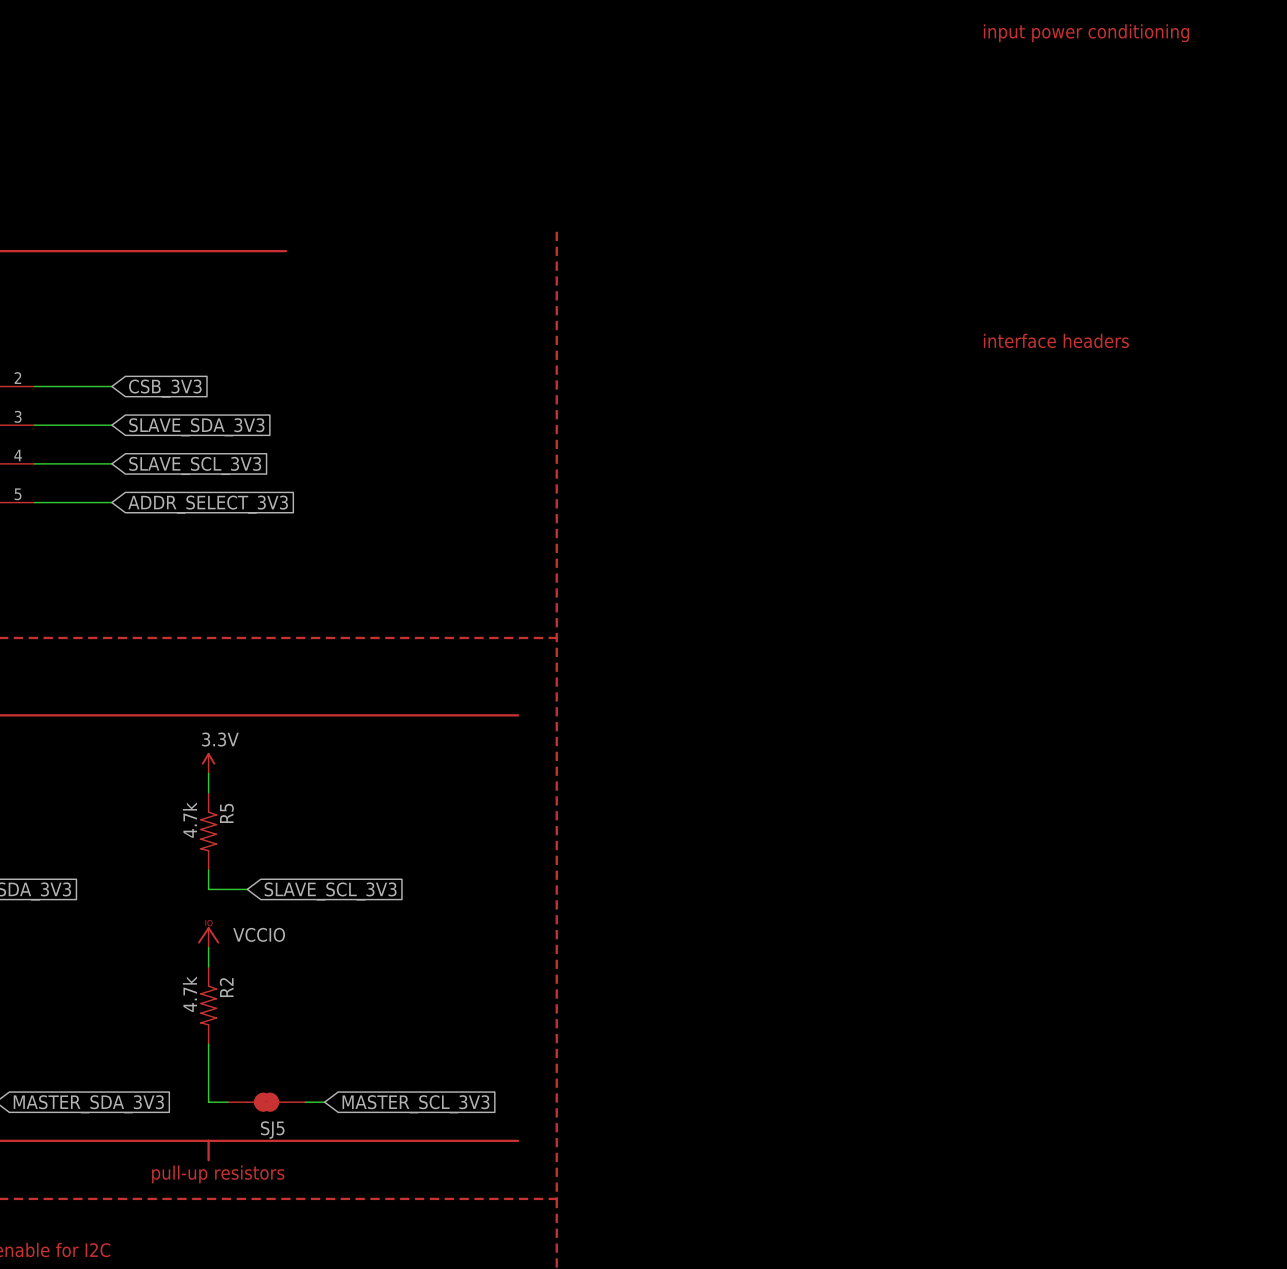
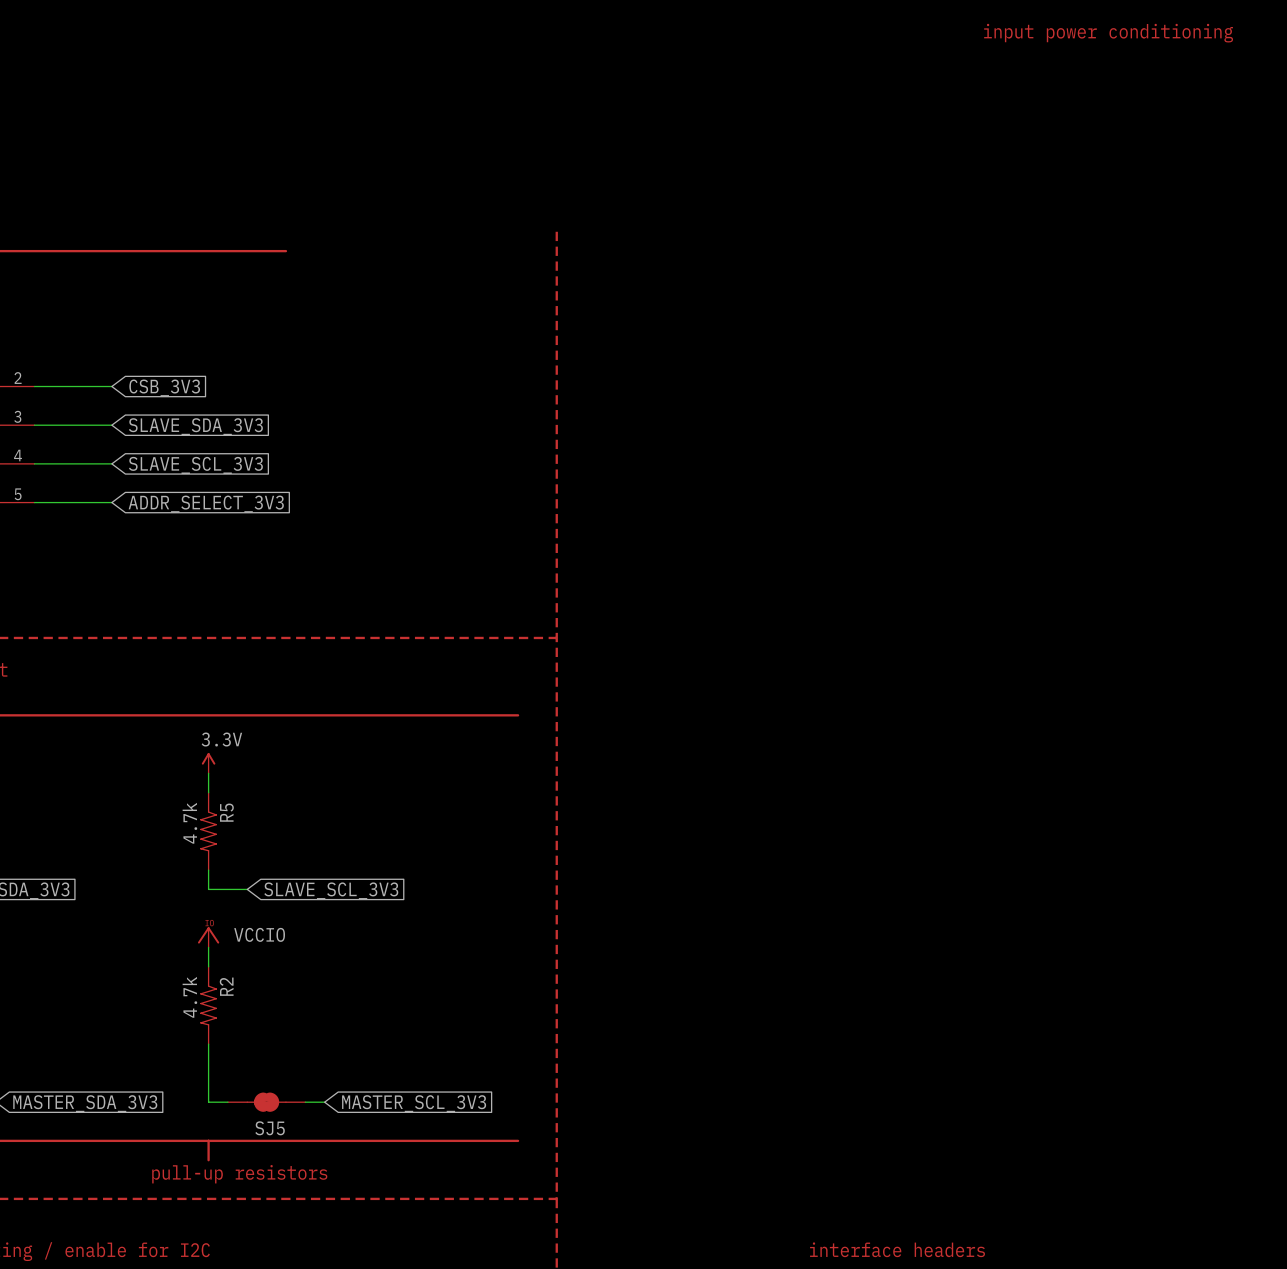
text: interface headers (1056, 340) -> none
text: none -> interface headers (897, 1249)

